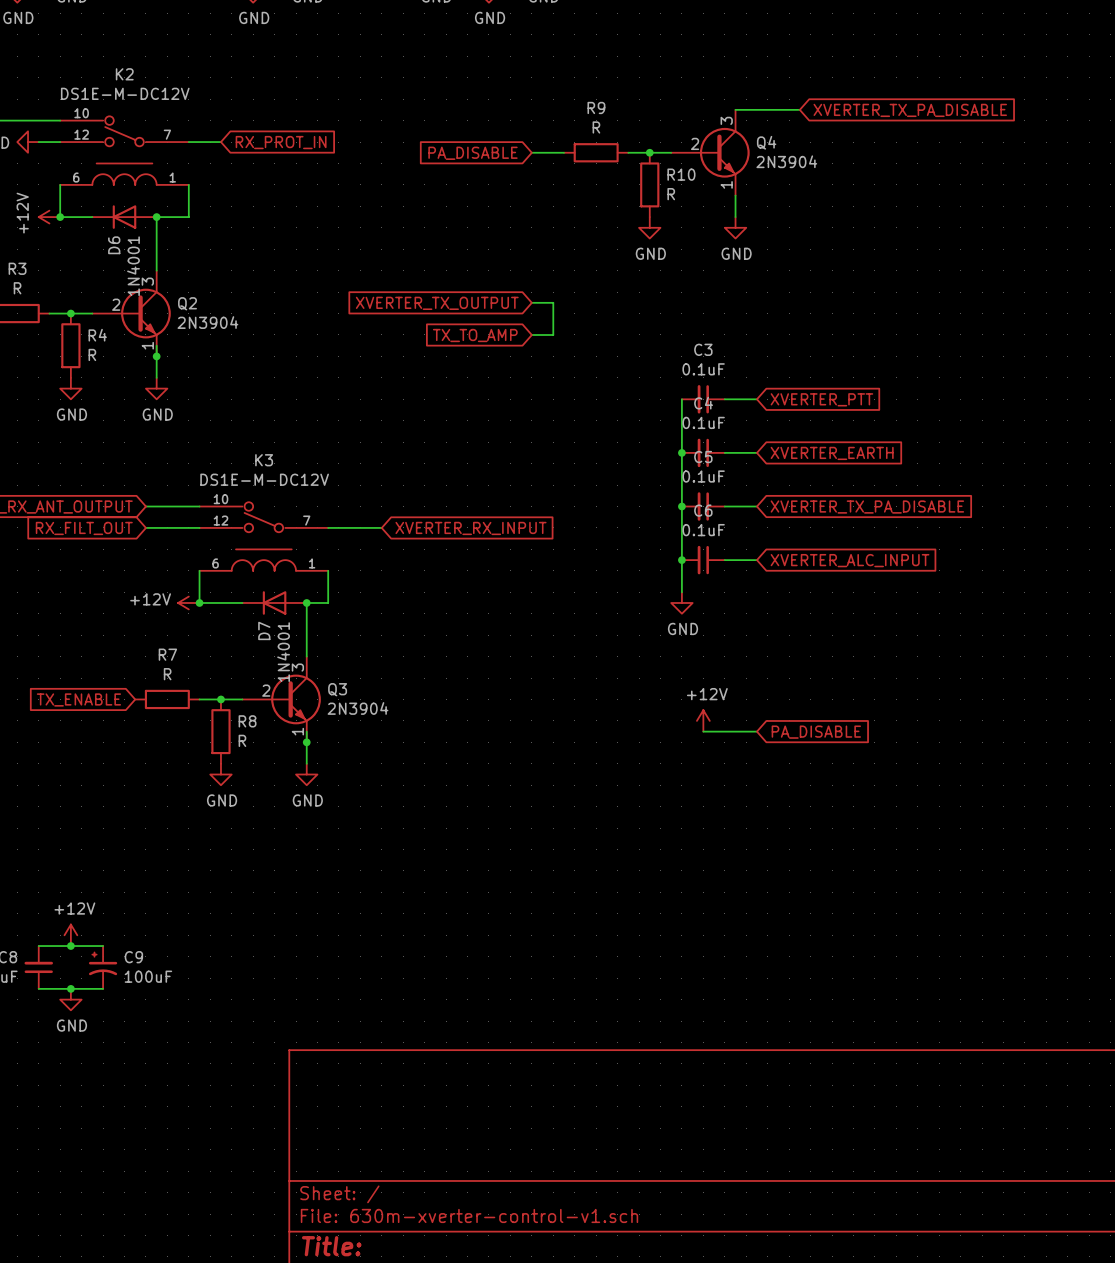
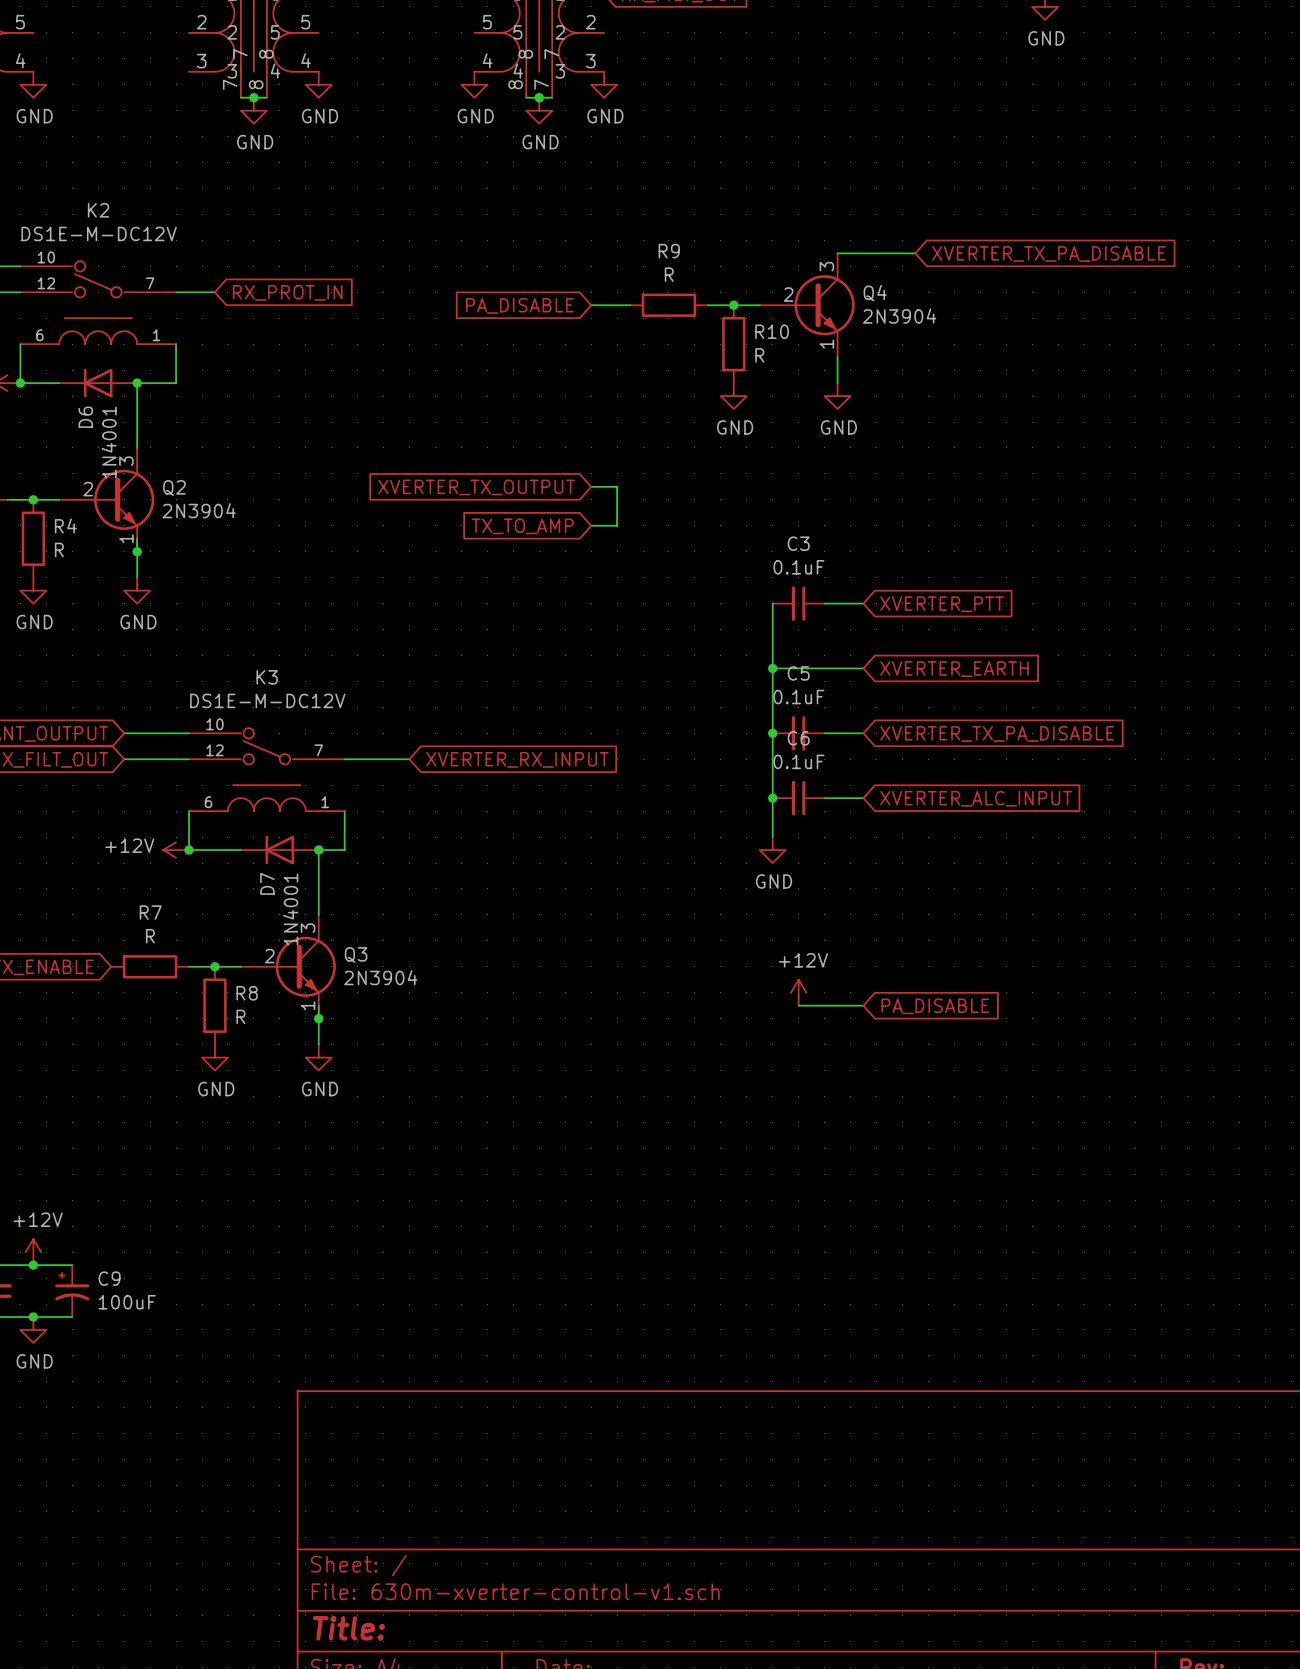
C4: 0.1uF (703, 452) -> none

